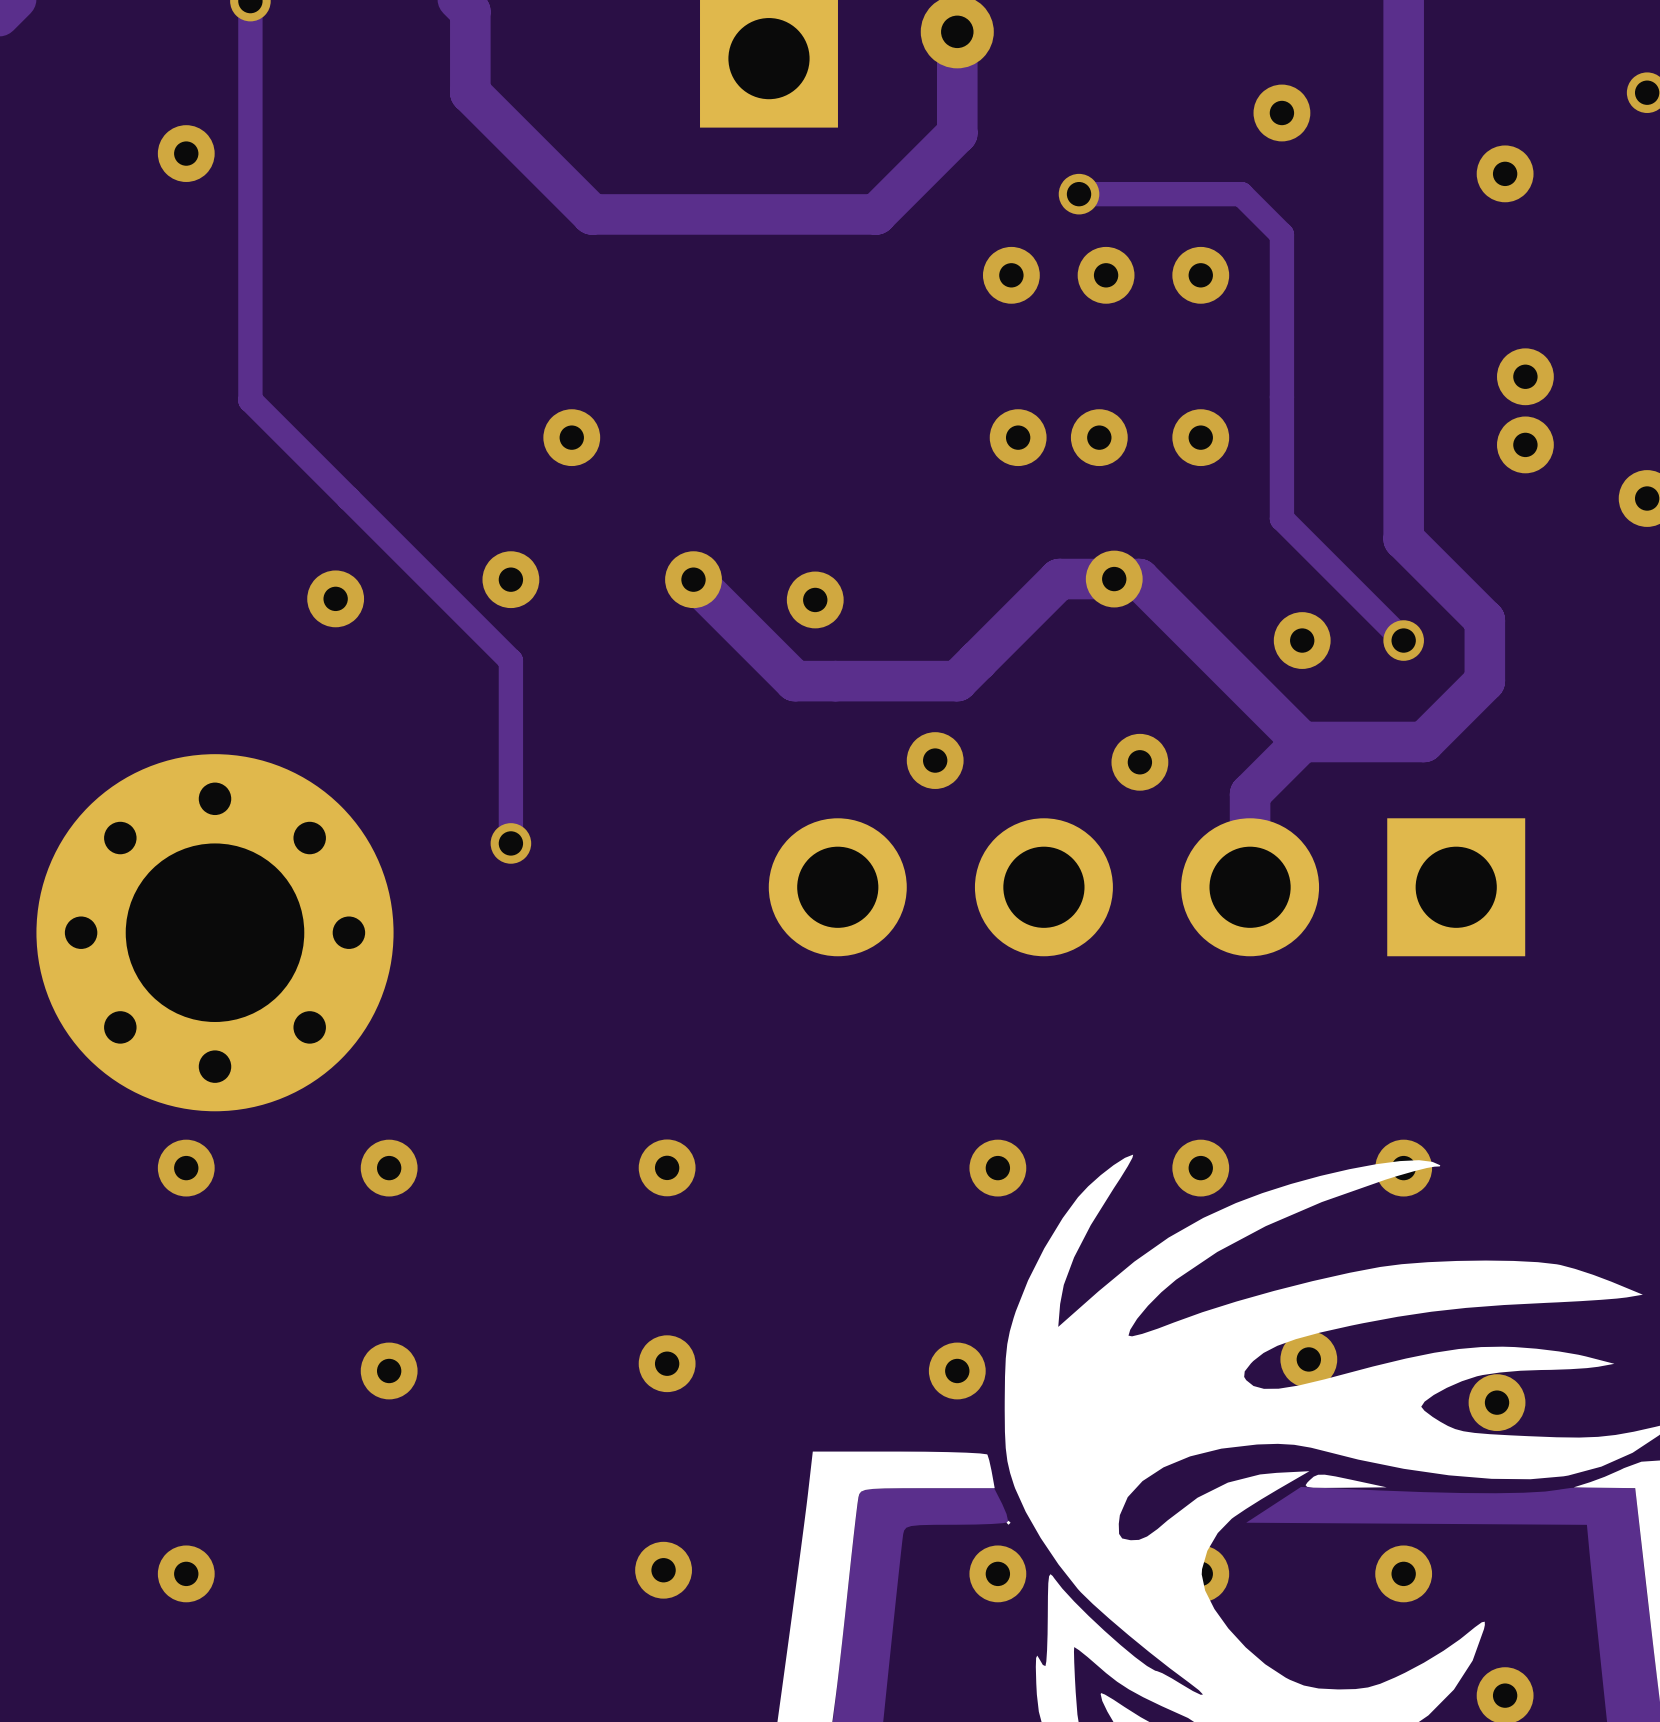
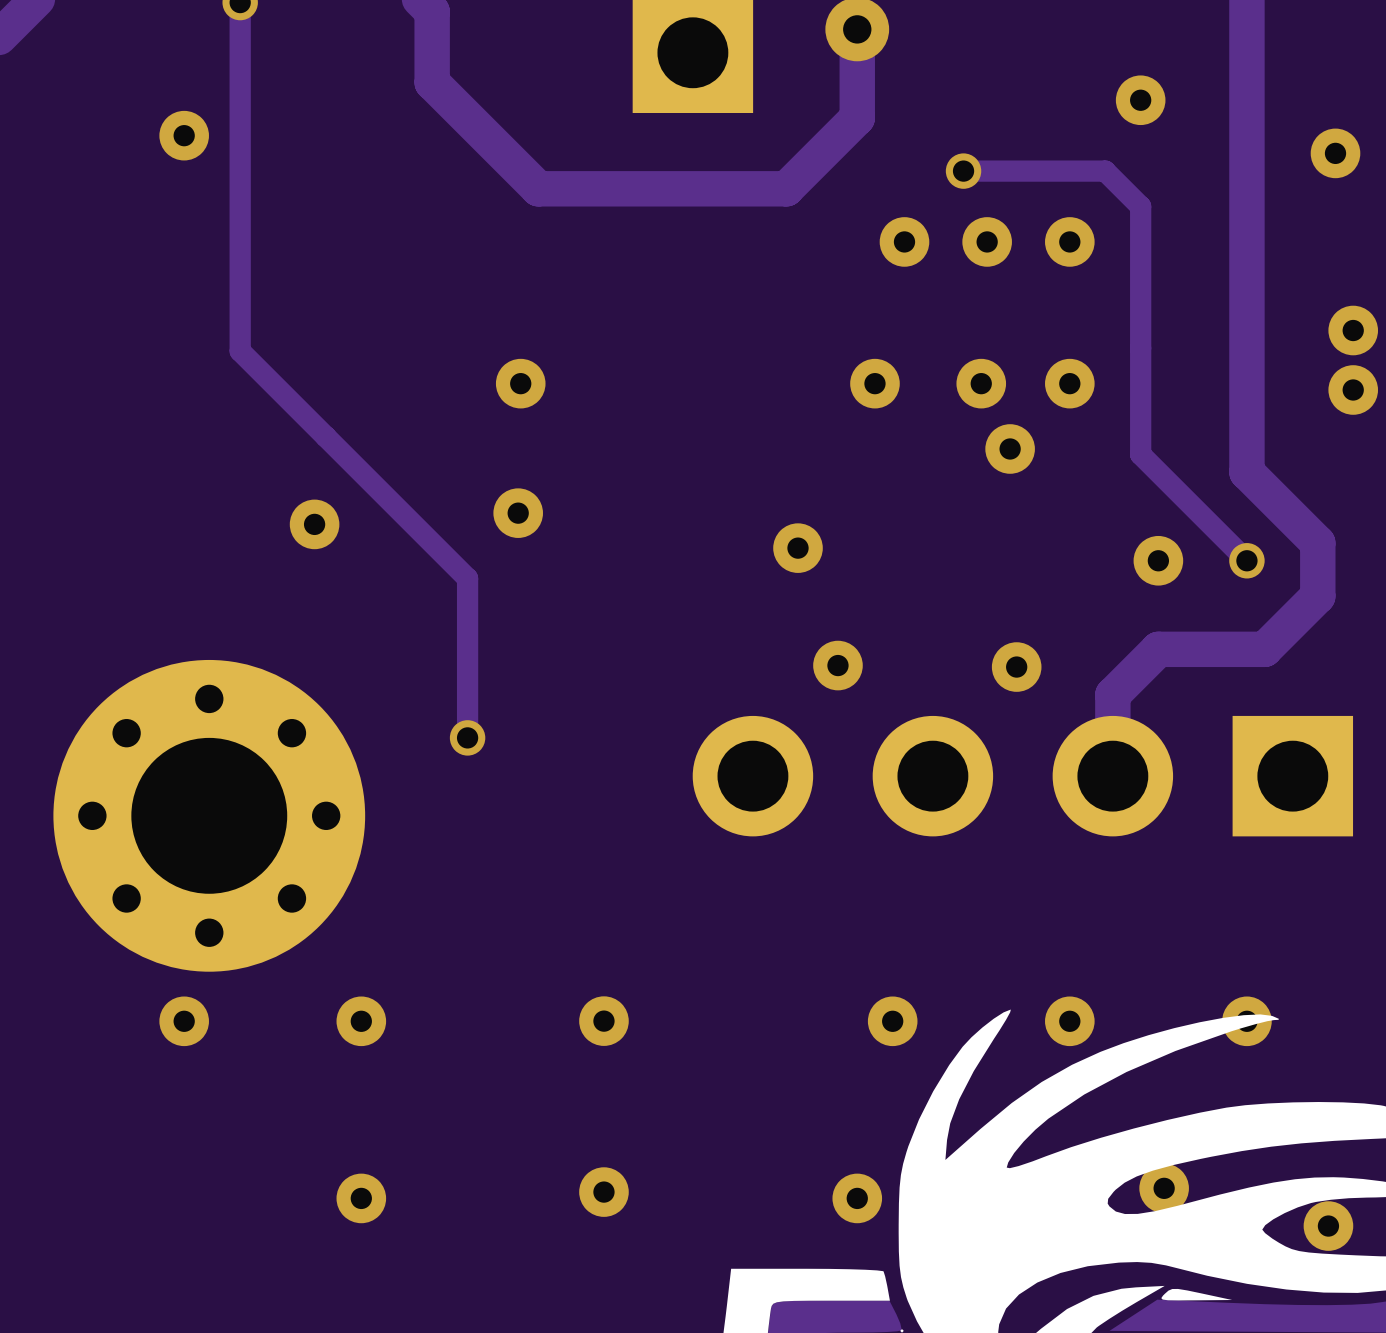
via position: (1018, 437) -> (874, 383)
via: none -> (1010, 448)
via position: (510, 579) -> (518, 513)
track: (693, 579) (794, 681) (957, 681) (1059, 579) (1139, 579) (1302, 741) -> none
via: (693, 579) -> none
via: (1114, 579) -> none
via position: (815, 599) -> (798, 548)

